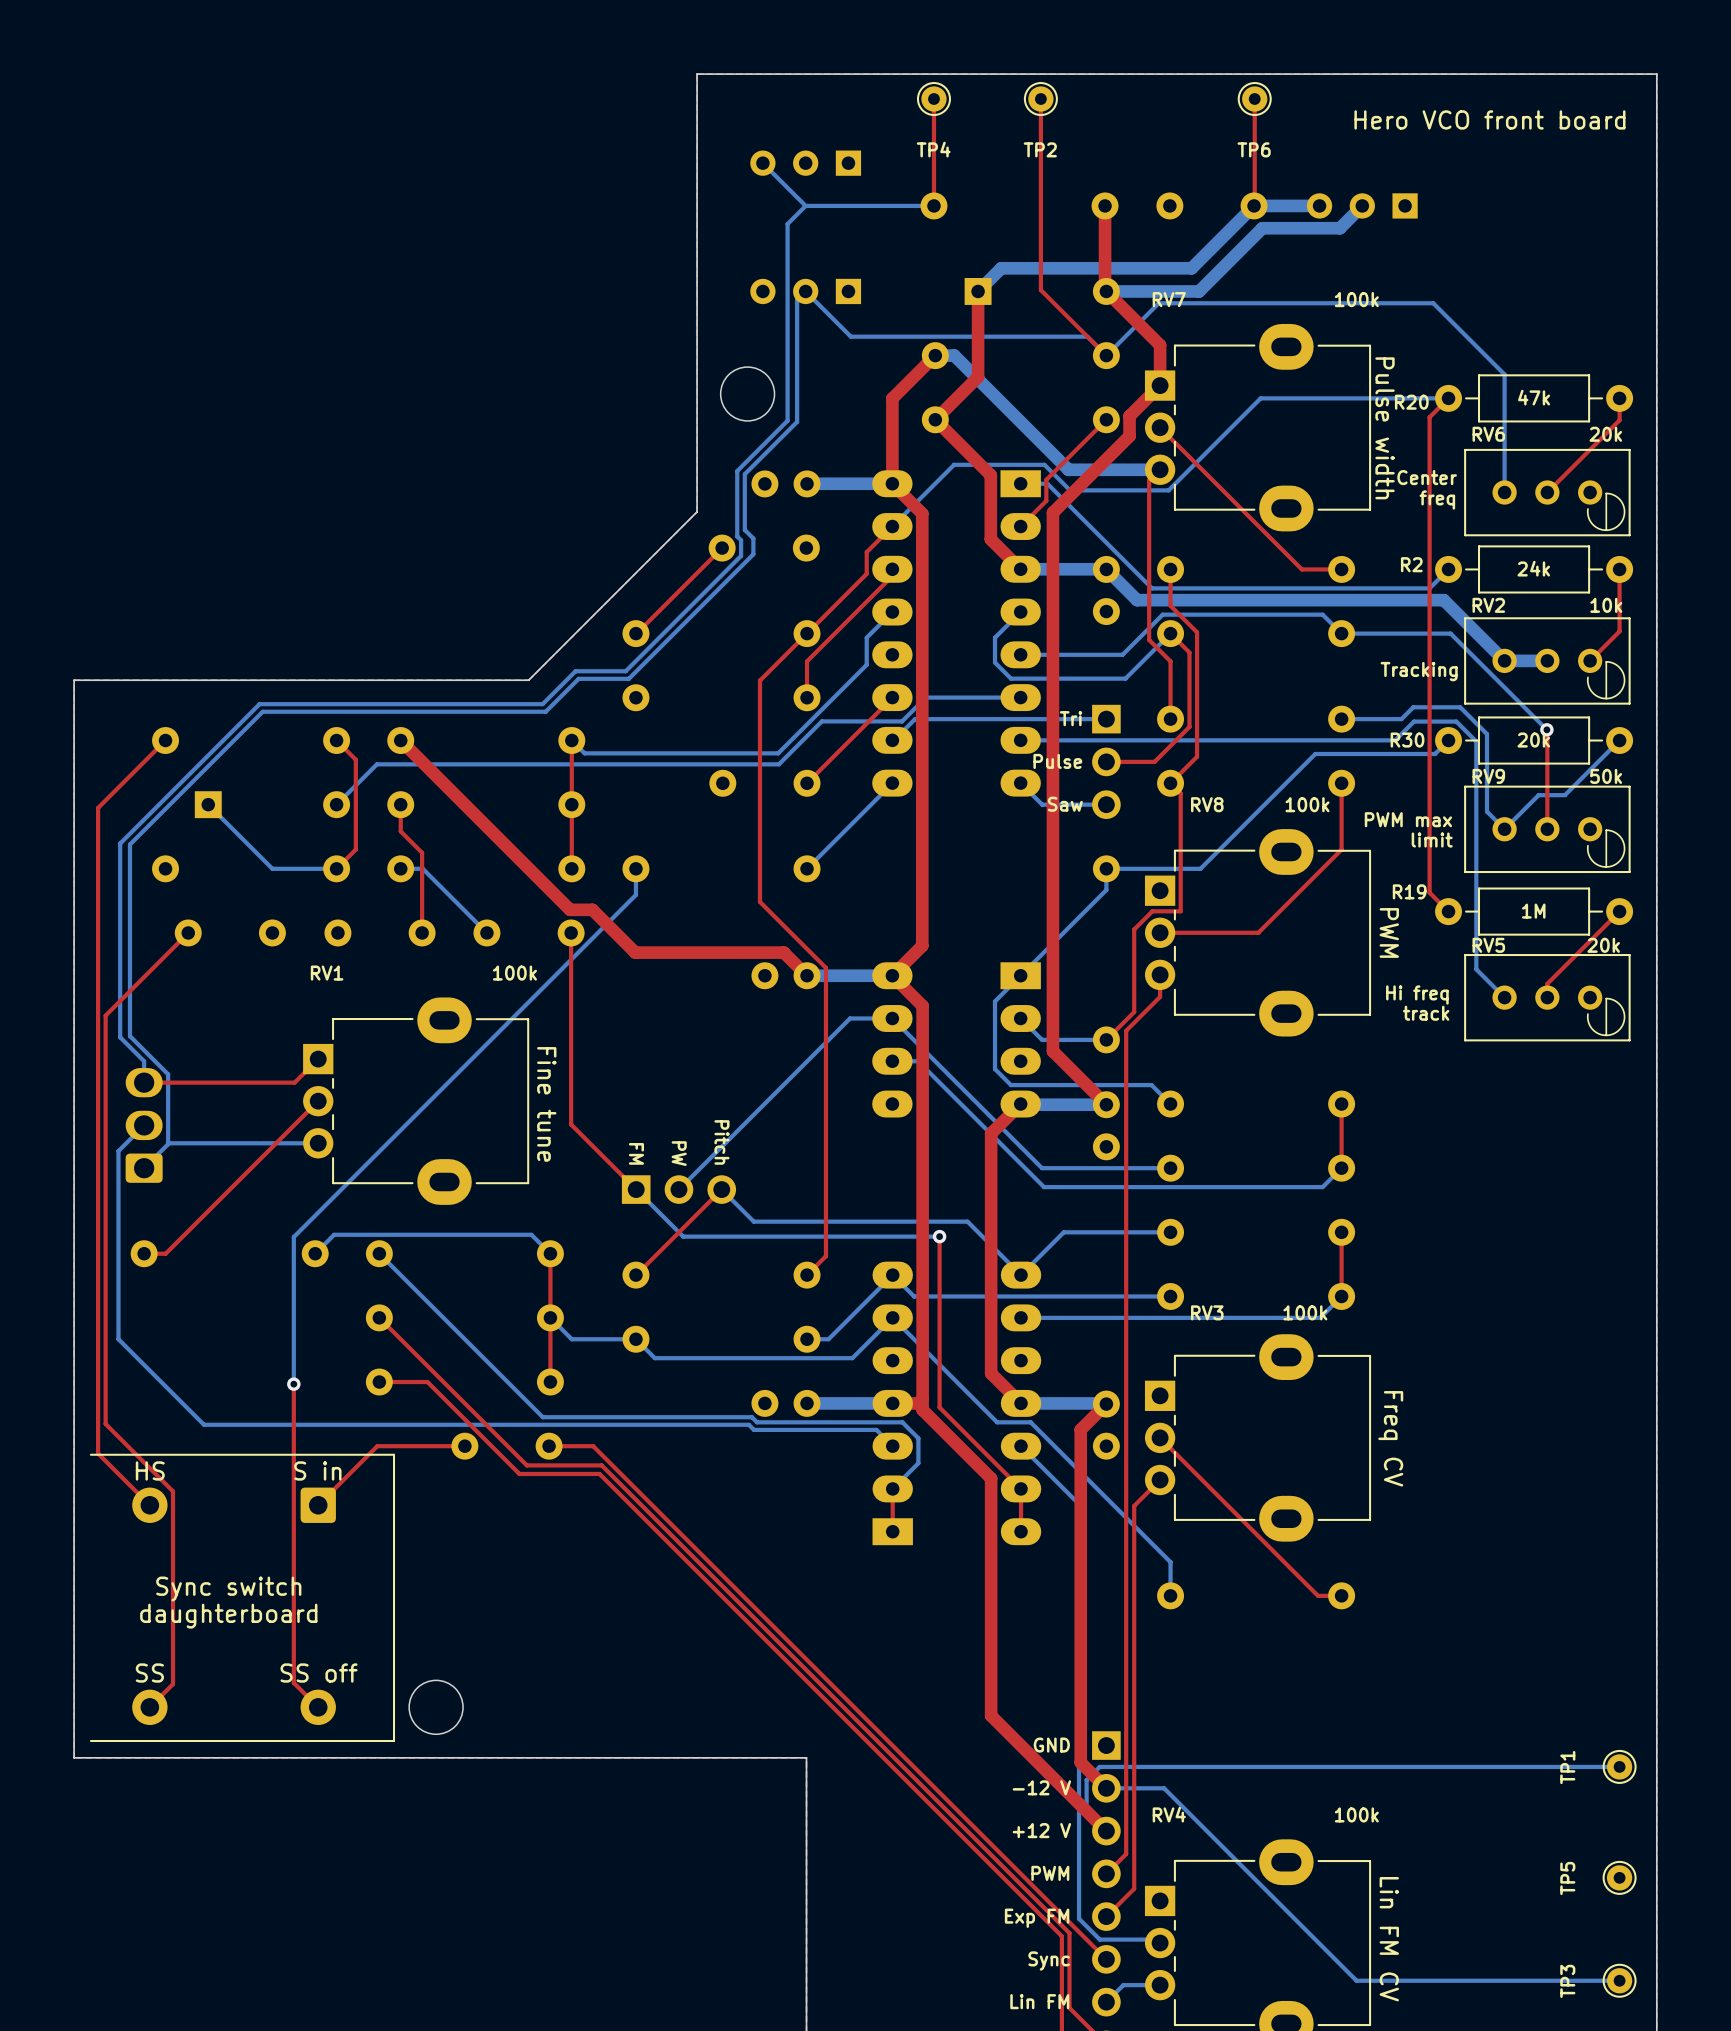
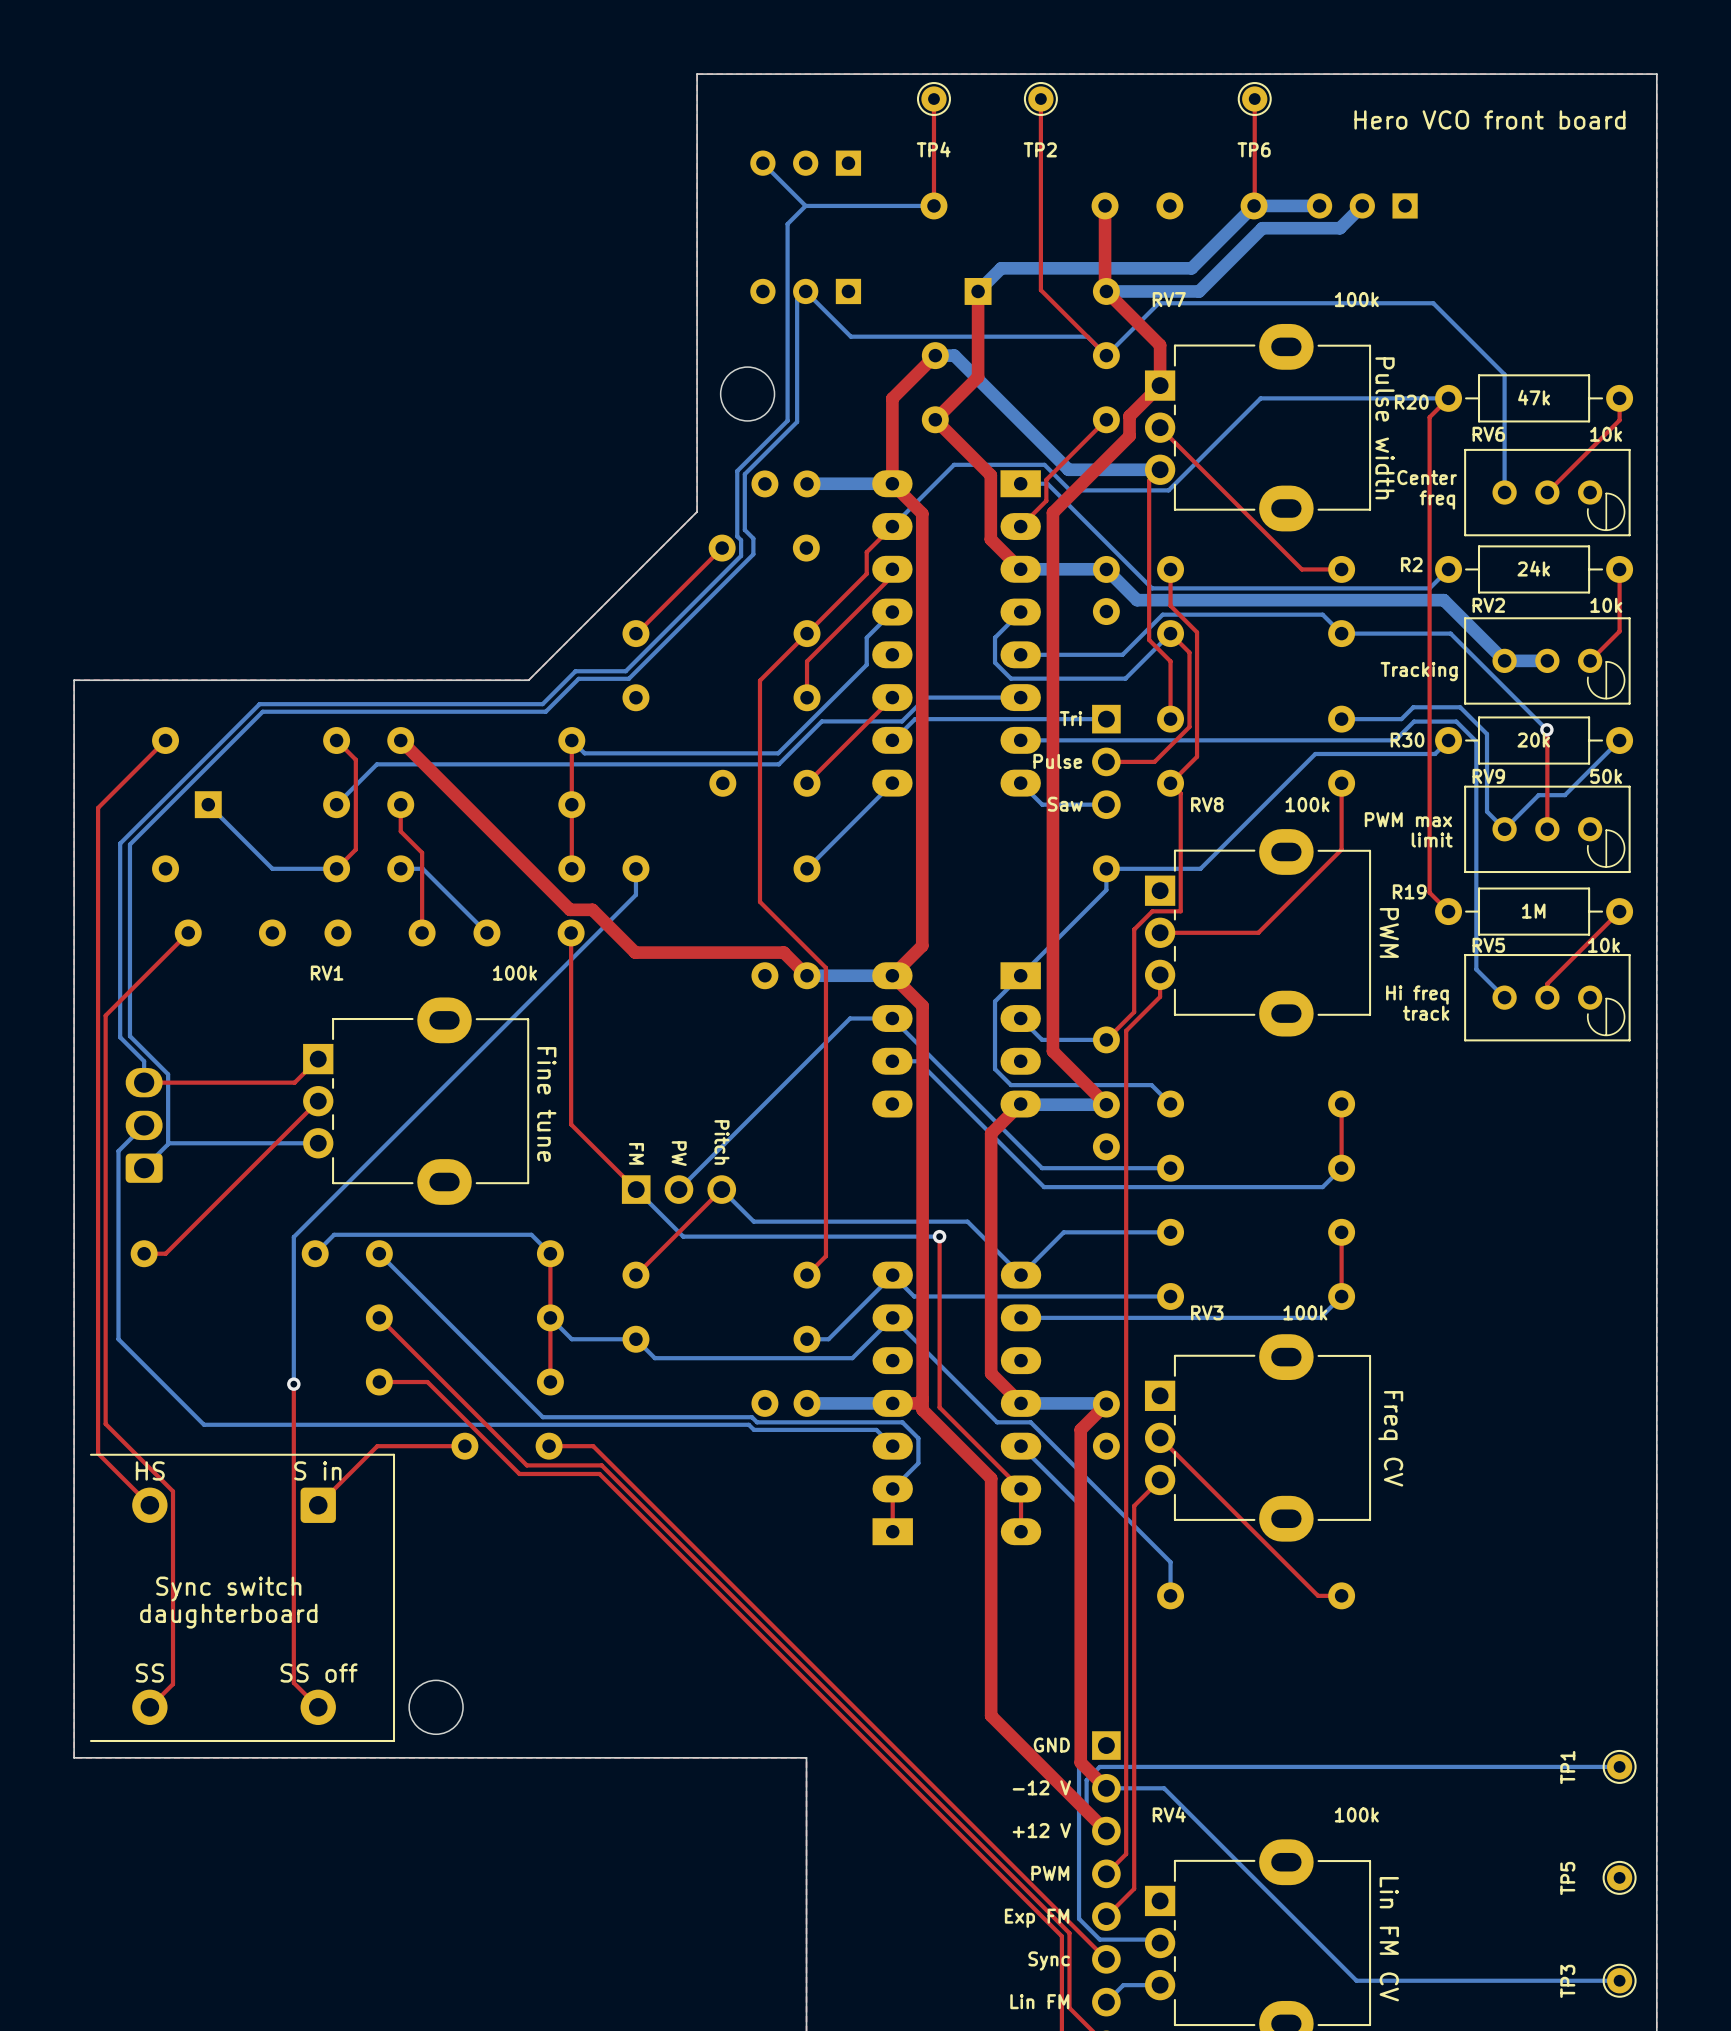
RV6 value: 20k (1605, 434) -> 10k (1606, 434)
RV5 value: 20k (1603, 945) -> 10k (1603, 945)

